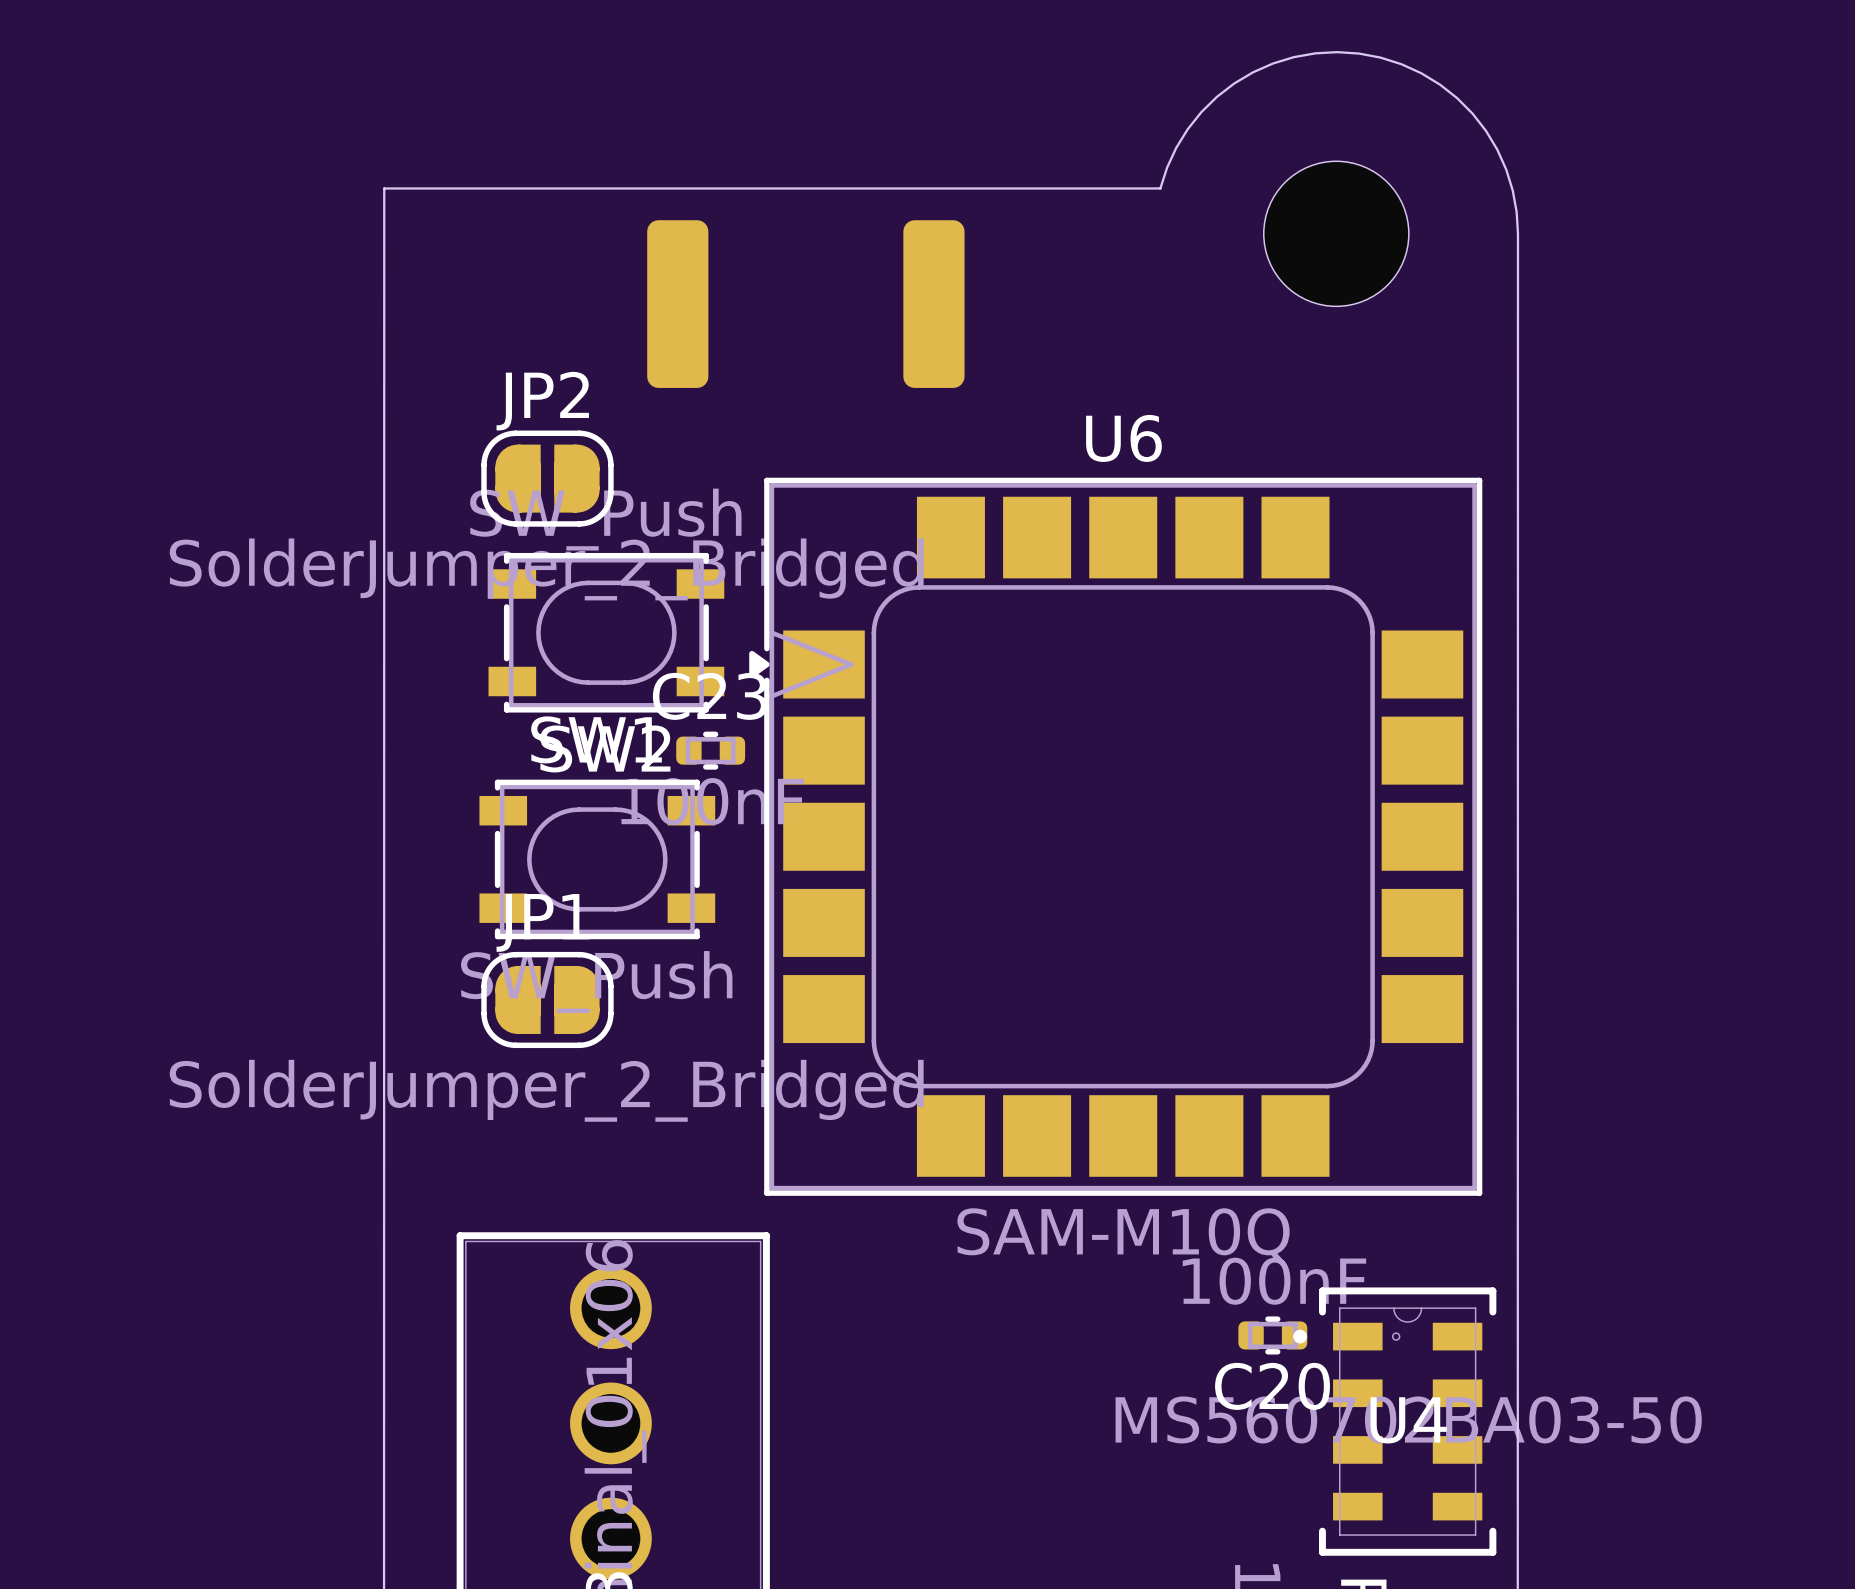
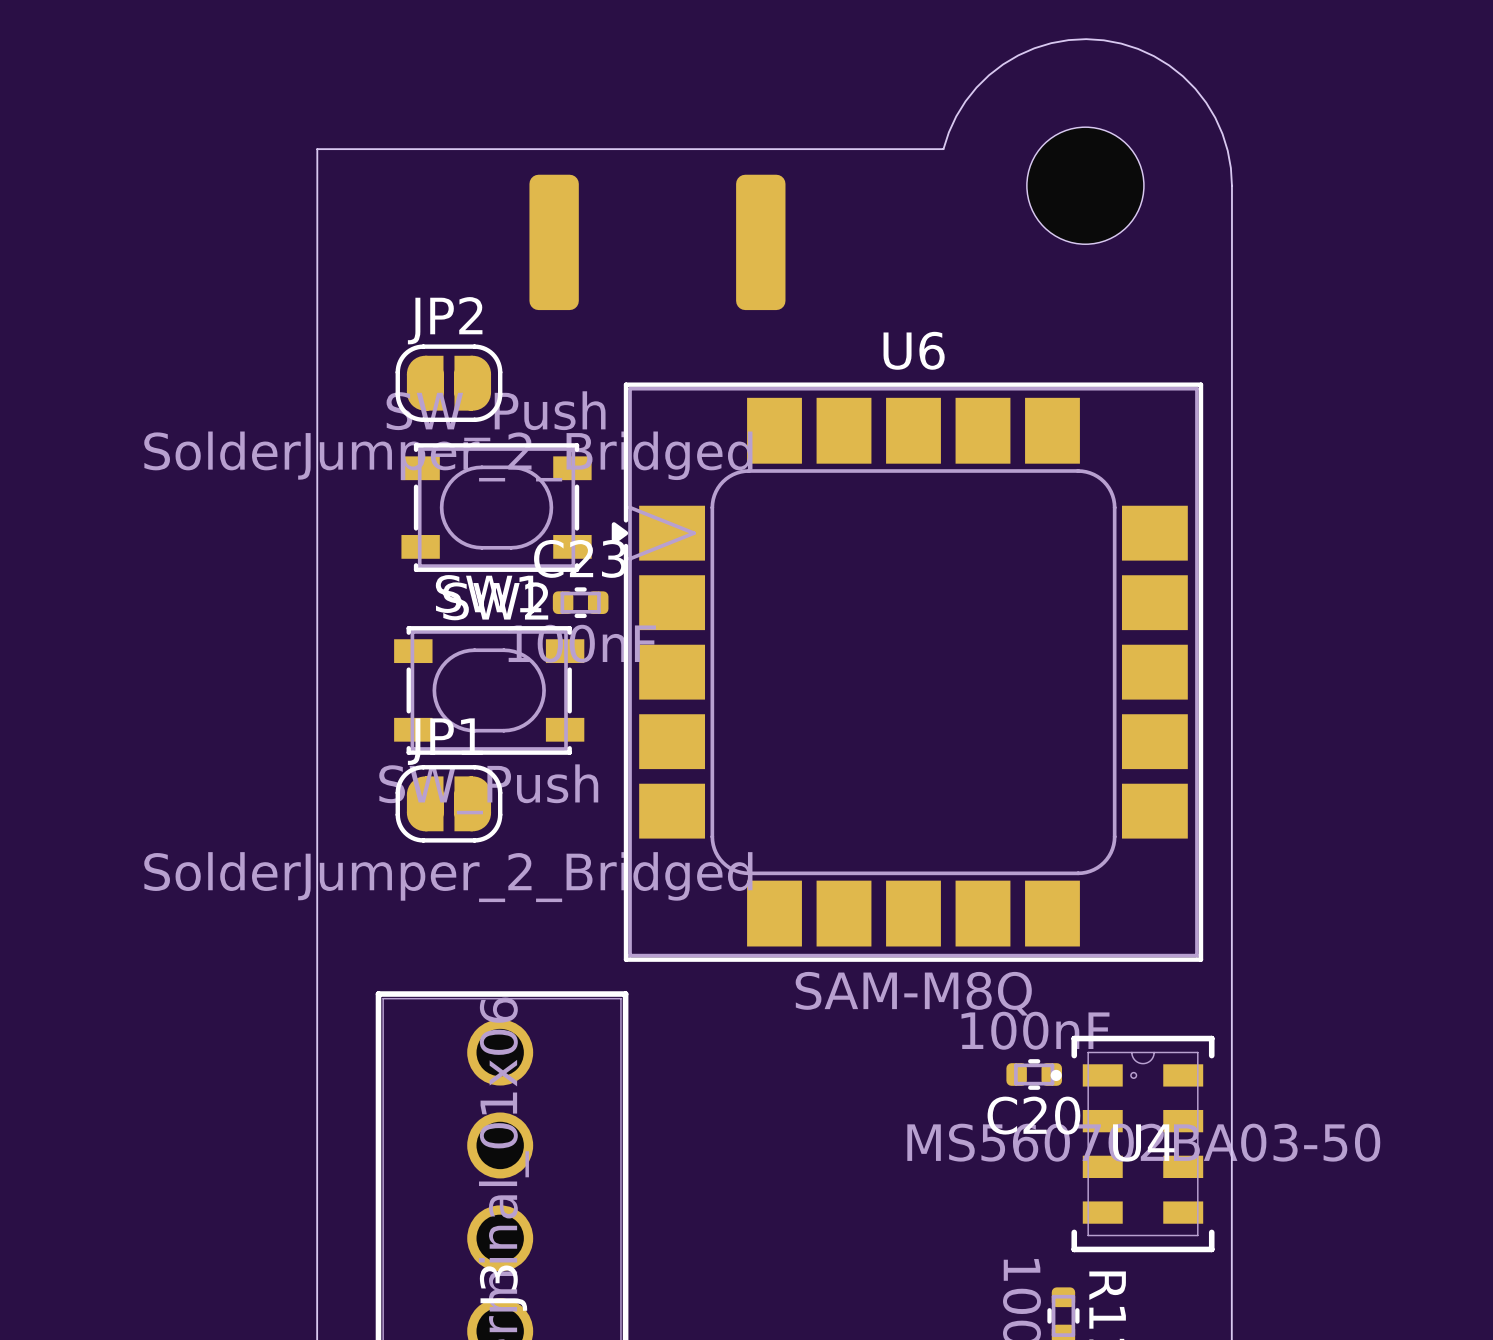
U6 value: SAM-M10Q (1123, 1235) -> SAM-M8Q (913, 993)

